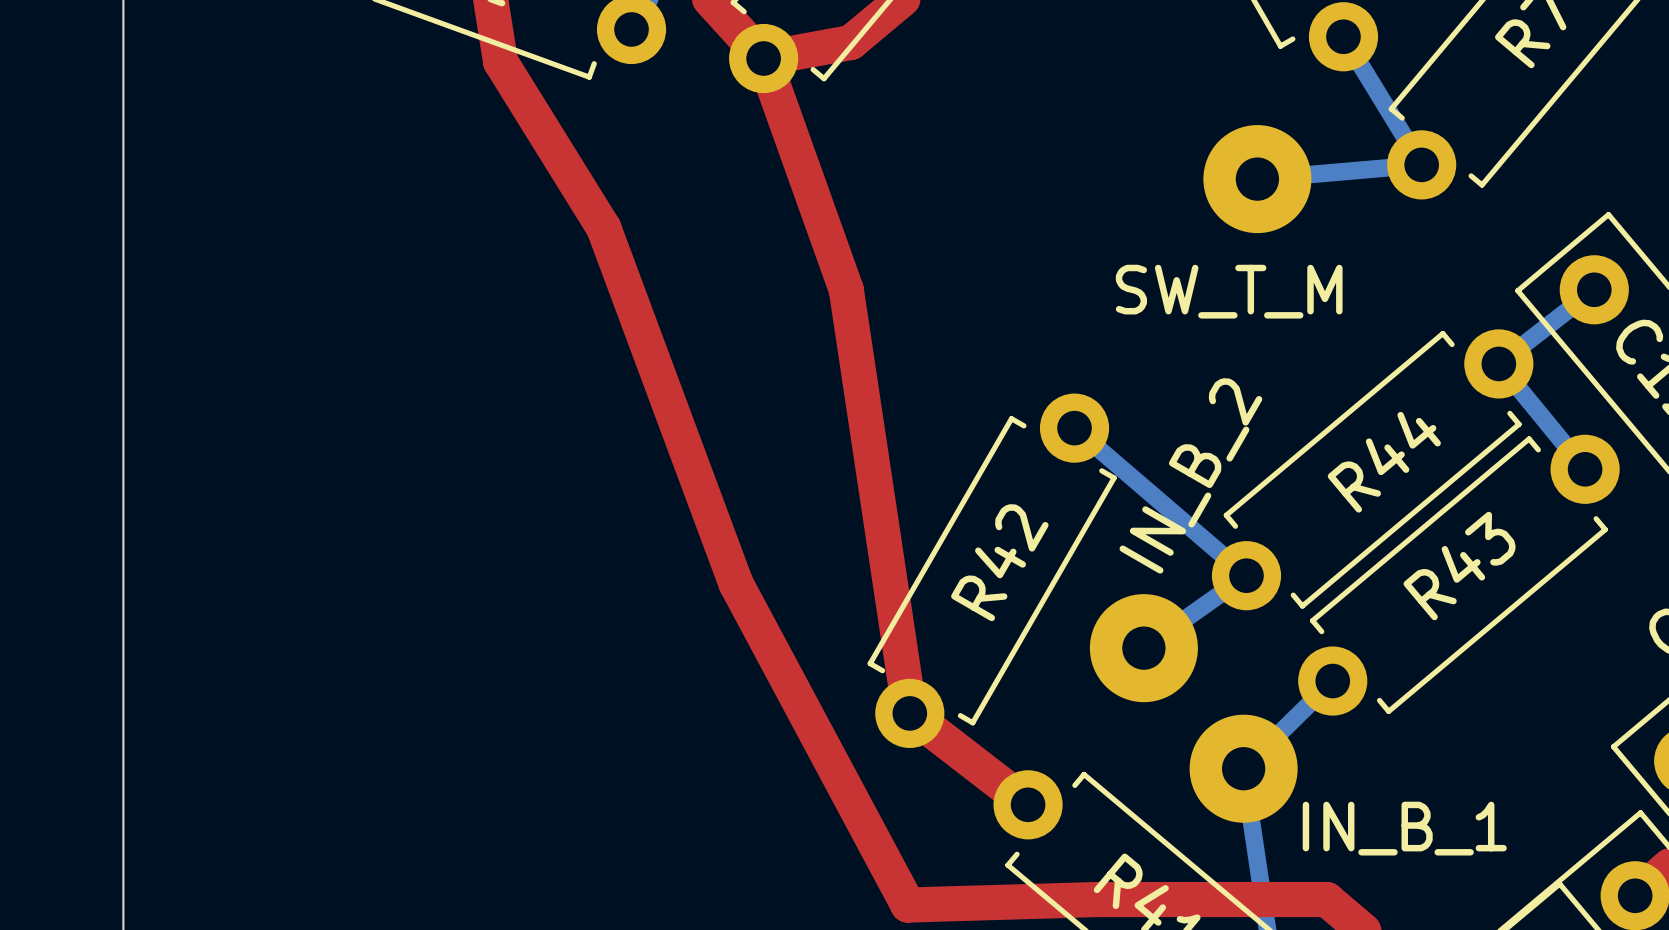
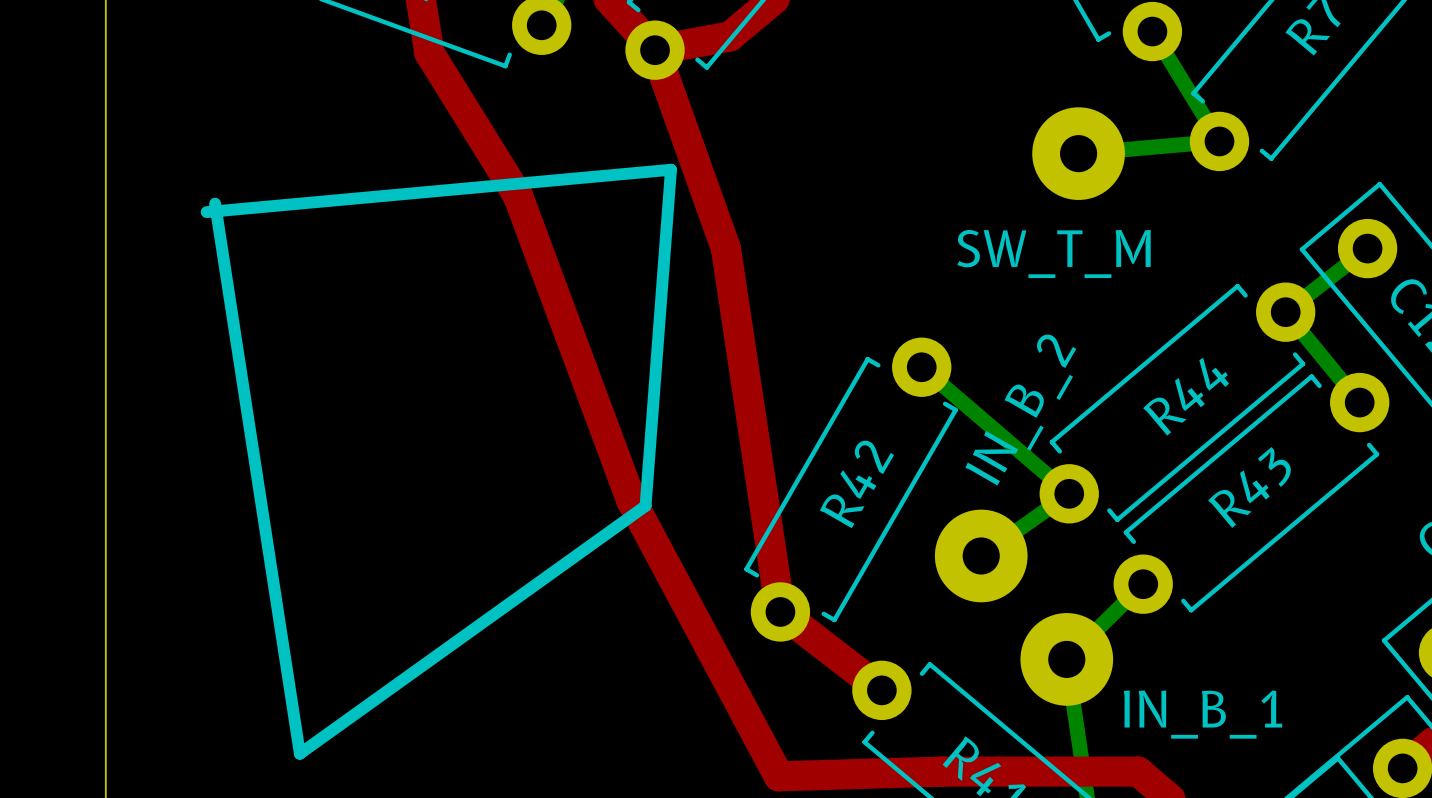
line: none -> (215, 203) (299, 753) (645, 506) (670, 169) (206, 212)

